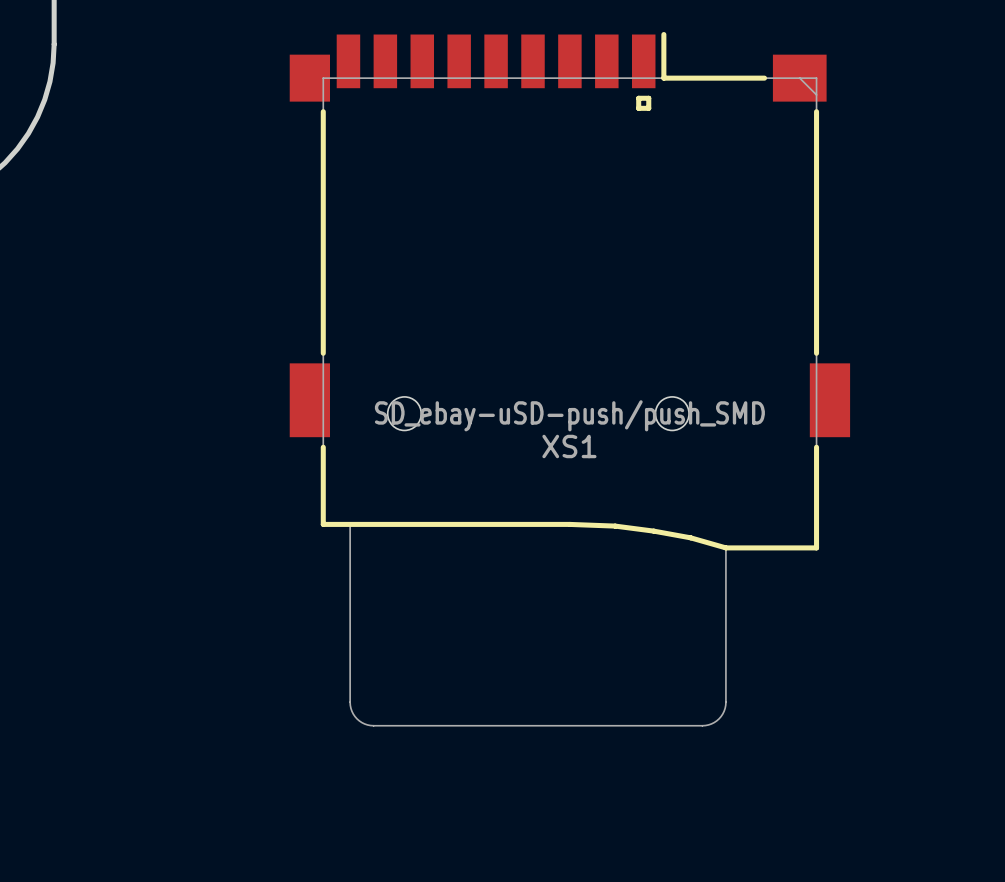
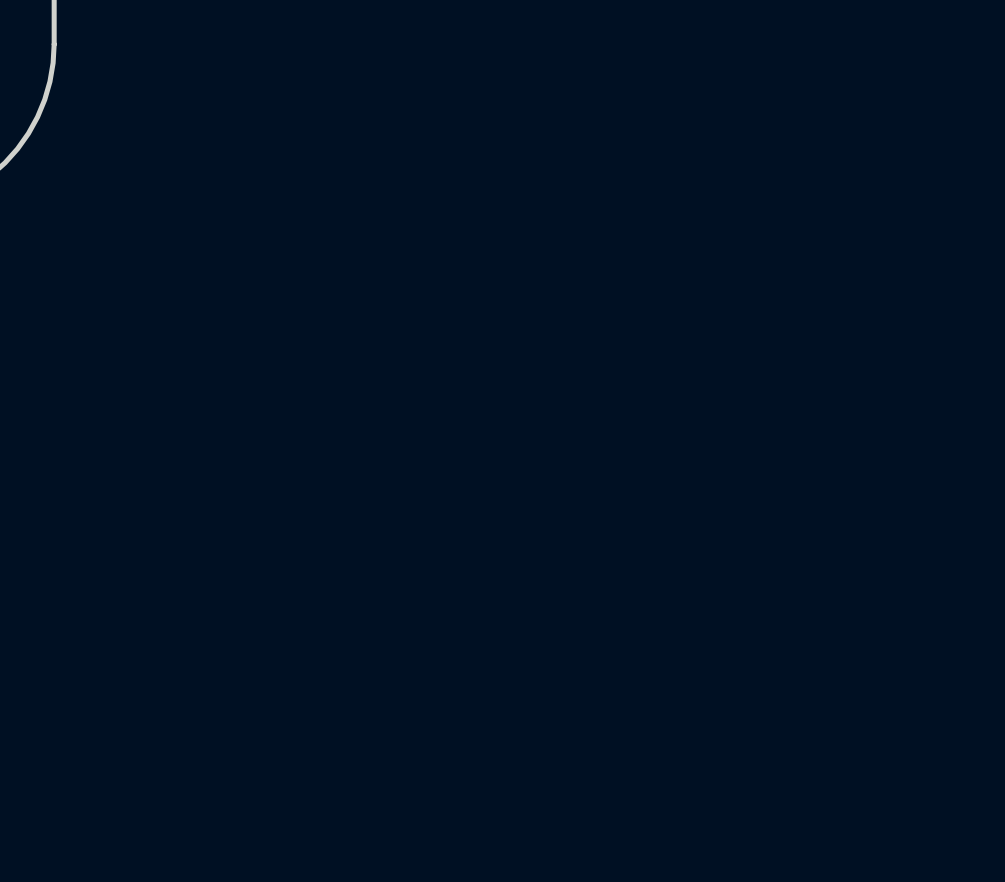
XS1: SD_ebay-uSD-push/push_SMD (569, 379) -> none

